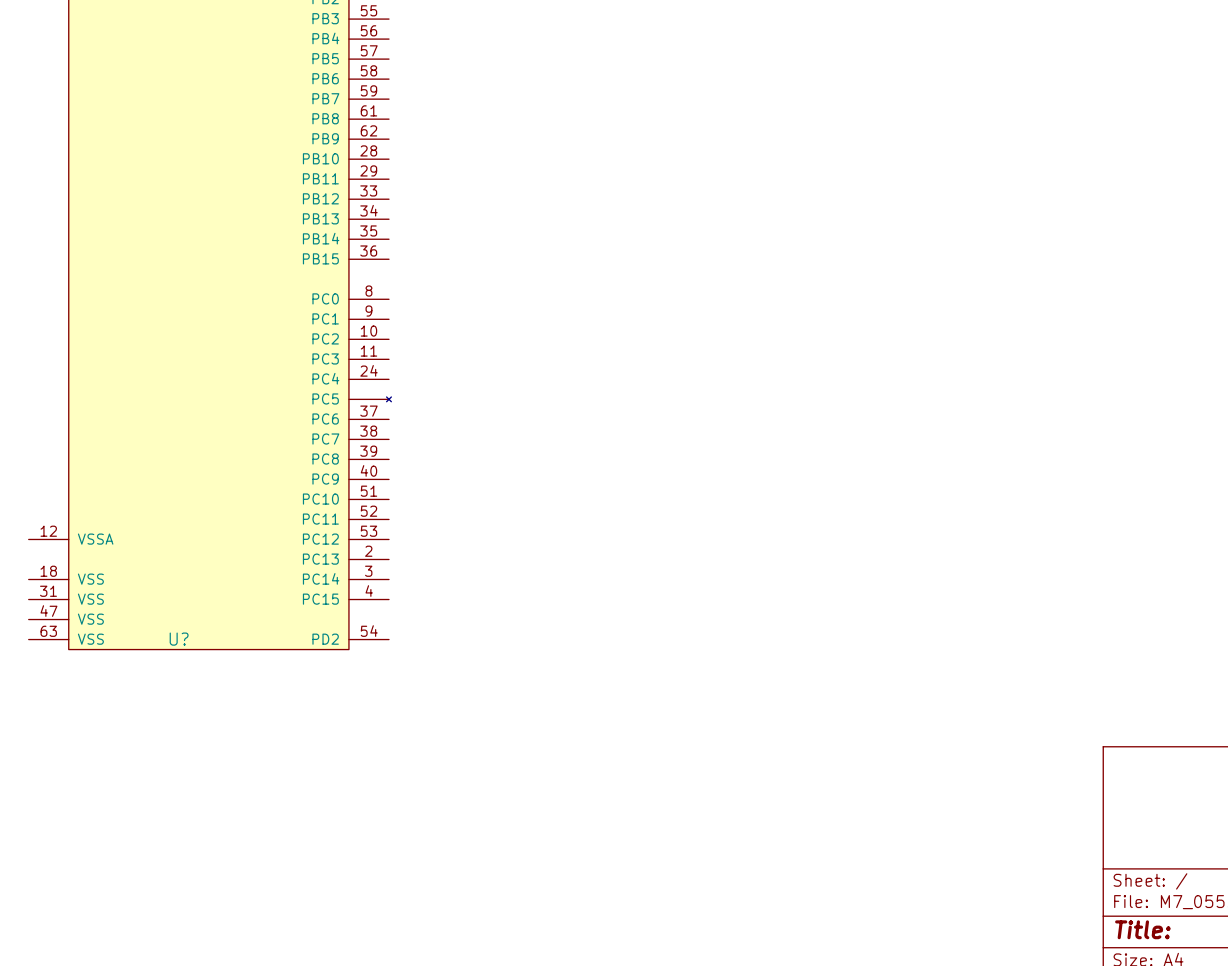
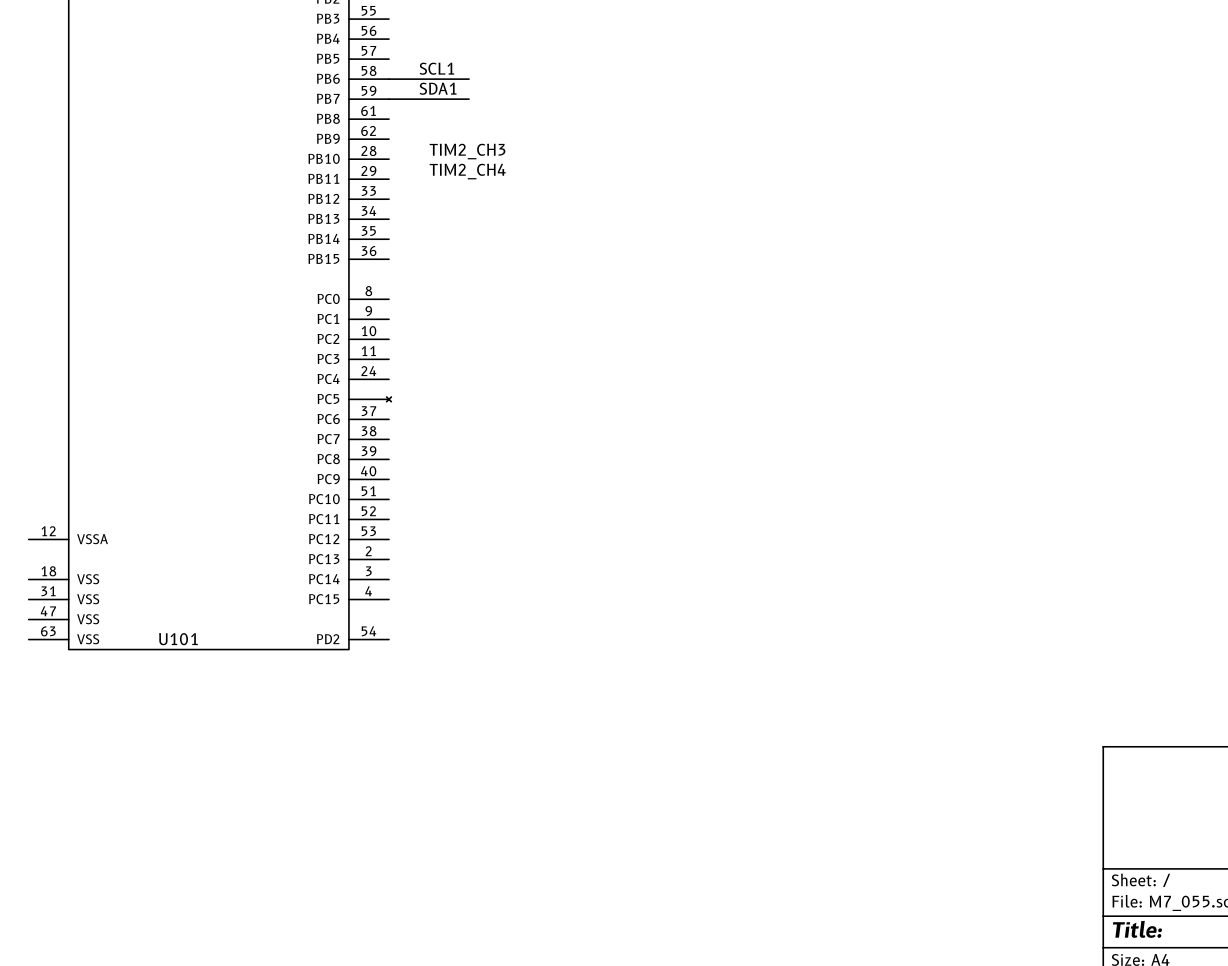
label: none -> SCL1 (436, 68)
wire: none -> (388, 79) (469, 79)
label: none -> SDA1 (438, 88)
wire: none -> (388, 99) (469, 99)
text: none -> TIM2_CH3 (467, 151)
text: none -> TIM2_CH4 (467, 171)
U? name: U? (179, 639) -> U101 (178, 639)

